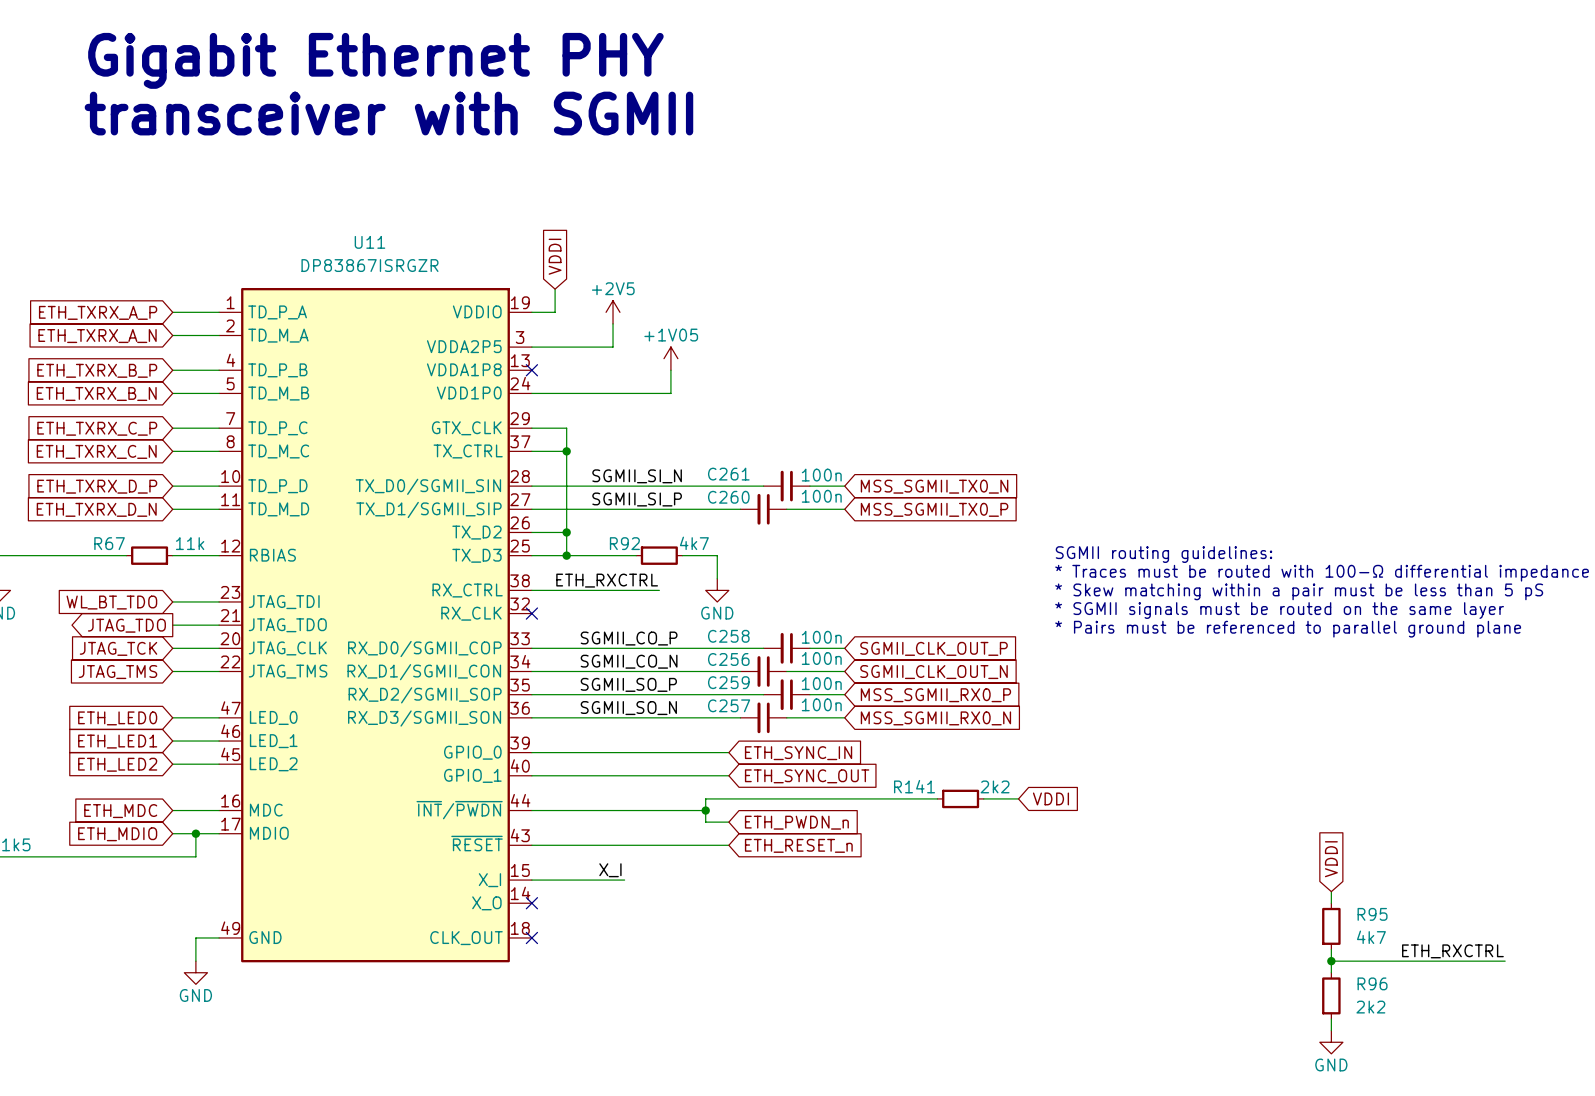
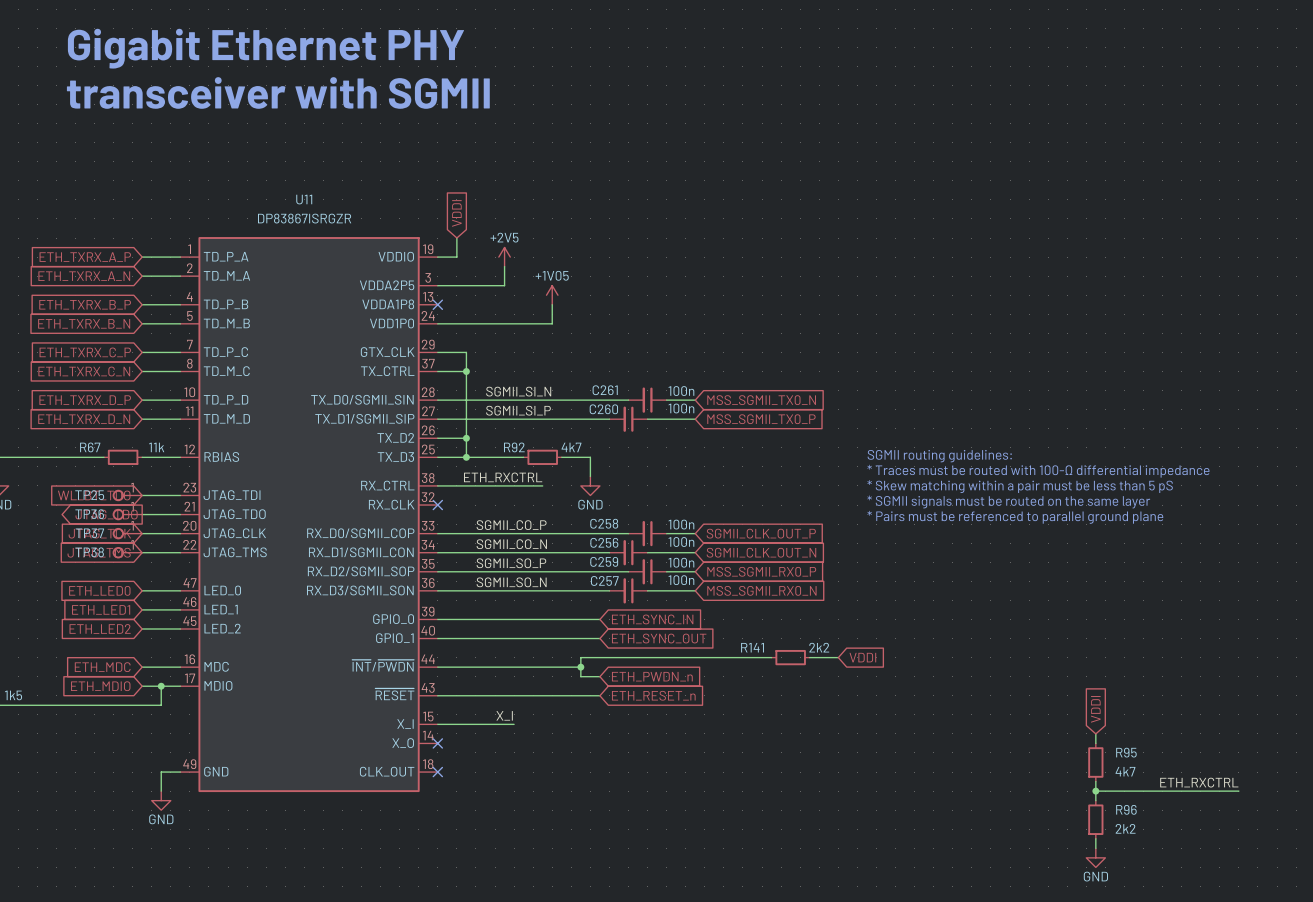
TP25: none -> (127, 495)
TP36: none -> (127, 514)
TP37: none -> (127, 533)
TP38: none -> (127, 552)

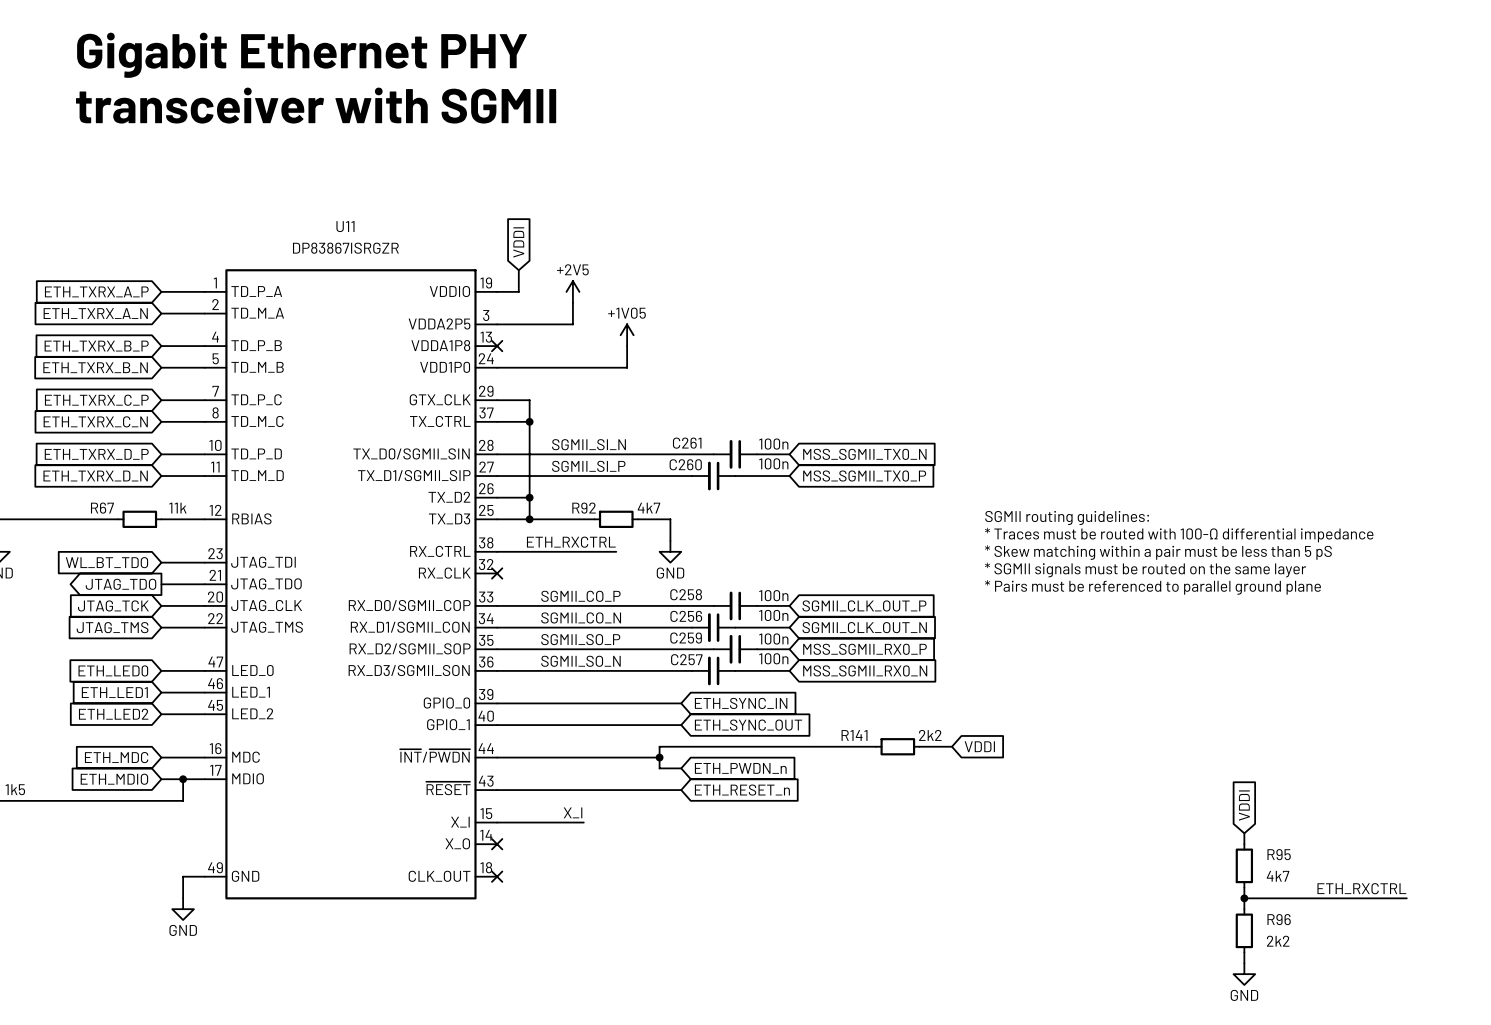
TP25: (127, 495) -> none
TP36: (127, 514) -> none
TP37: (127, 533) -> none
TP38: (127, 552) -> none

